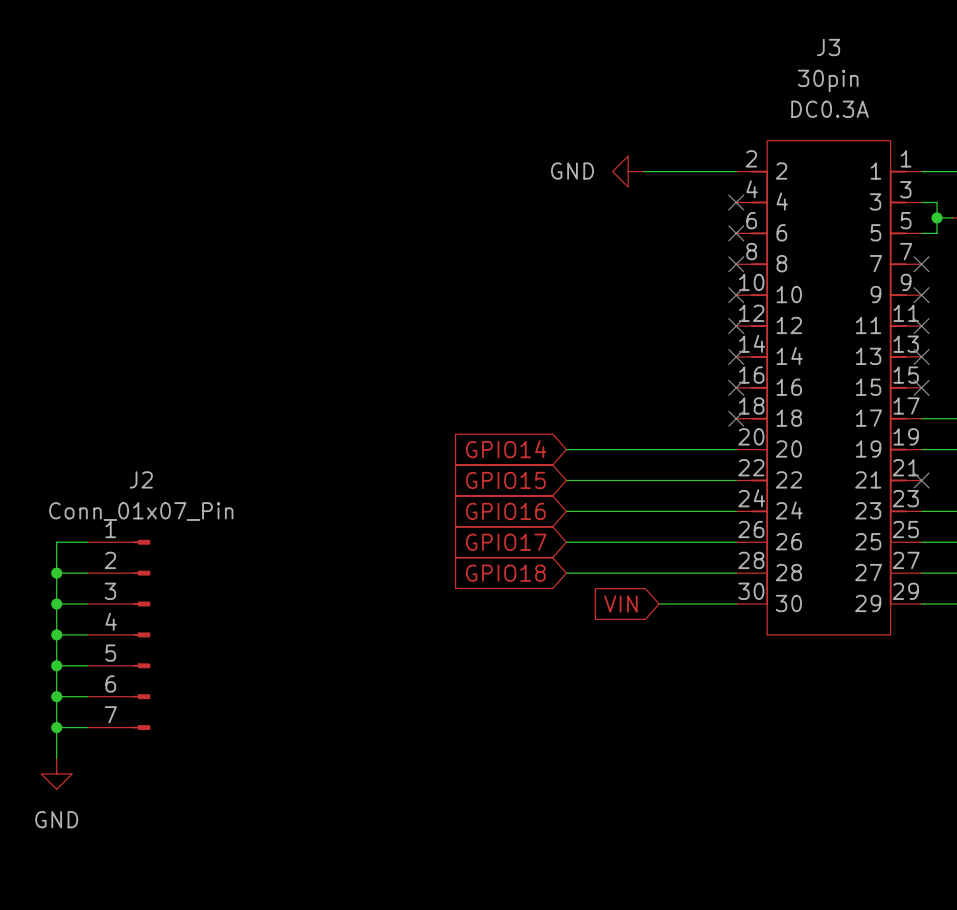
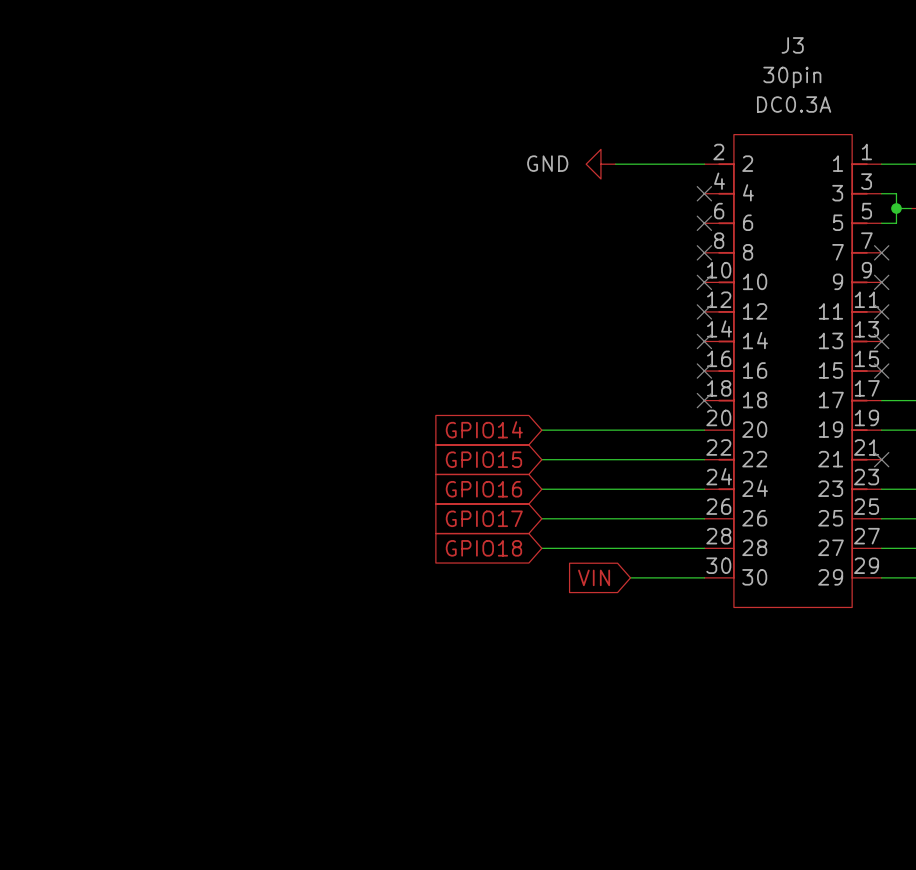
wire: (87, 542) (56, 542) (56, 758) -> none
wire: (56, 573) (87, 573) -> none
junction: (56, 573) -> none
wire: (56, 604) (87, 604) -> none
junction: (56, 604) -> none
wire: (56, 634) (87, 634) -> none
junction: (56, 634) -> none
J2: Conn_01x07_Pin (118, 634) -> none
wire: (56, 665) (87, 665) -> none
junction: (56, 665) -> none
wire: (56, 696) (87, 696) -> none
junction: (56, 696) -> none
wire: (56, 727) (87, 727) -> none
junction: (56, 727) -> none
power symbol: GND (56, 773) -> none

